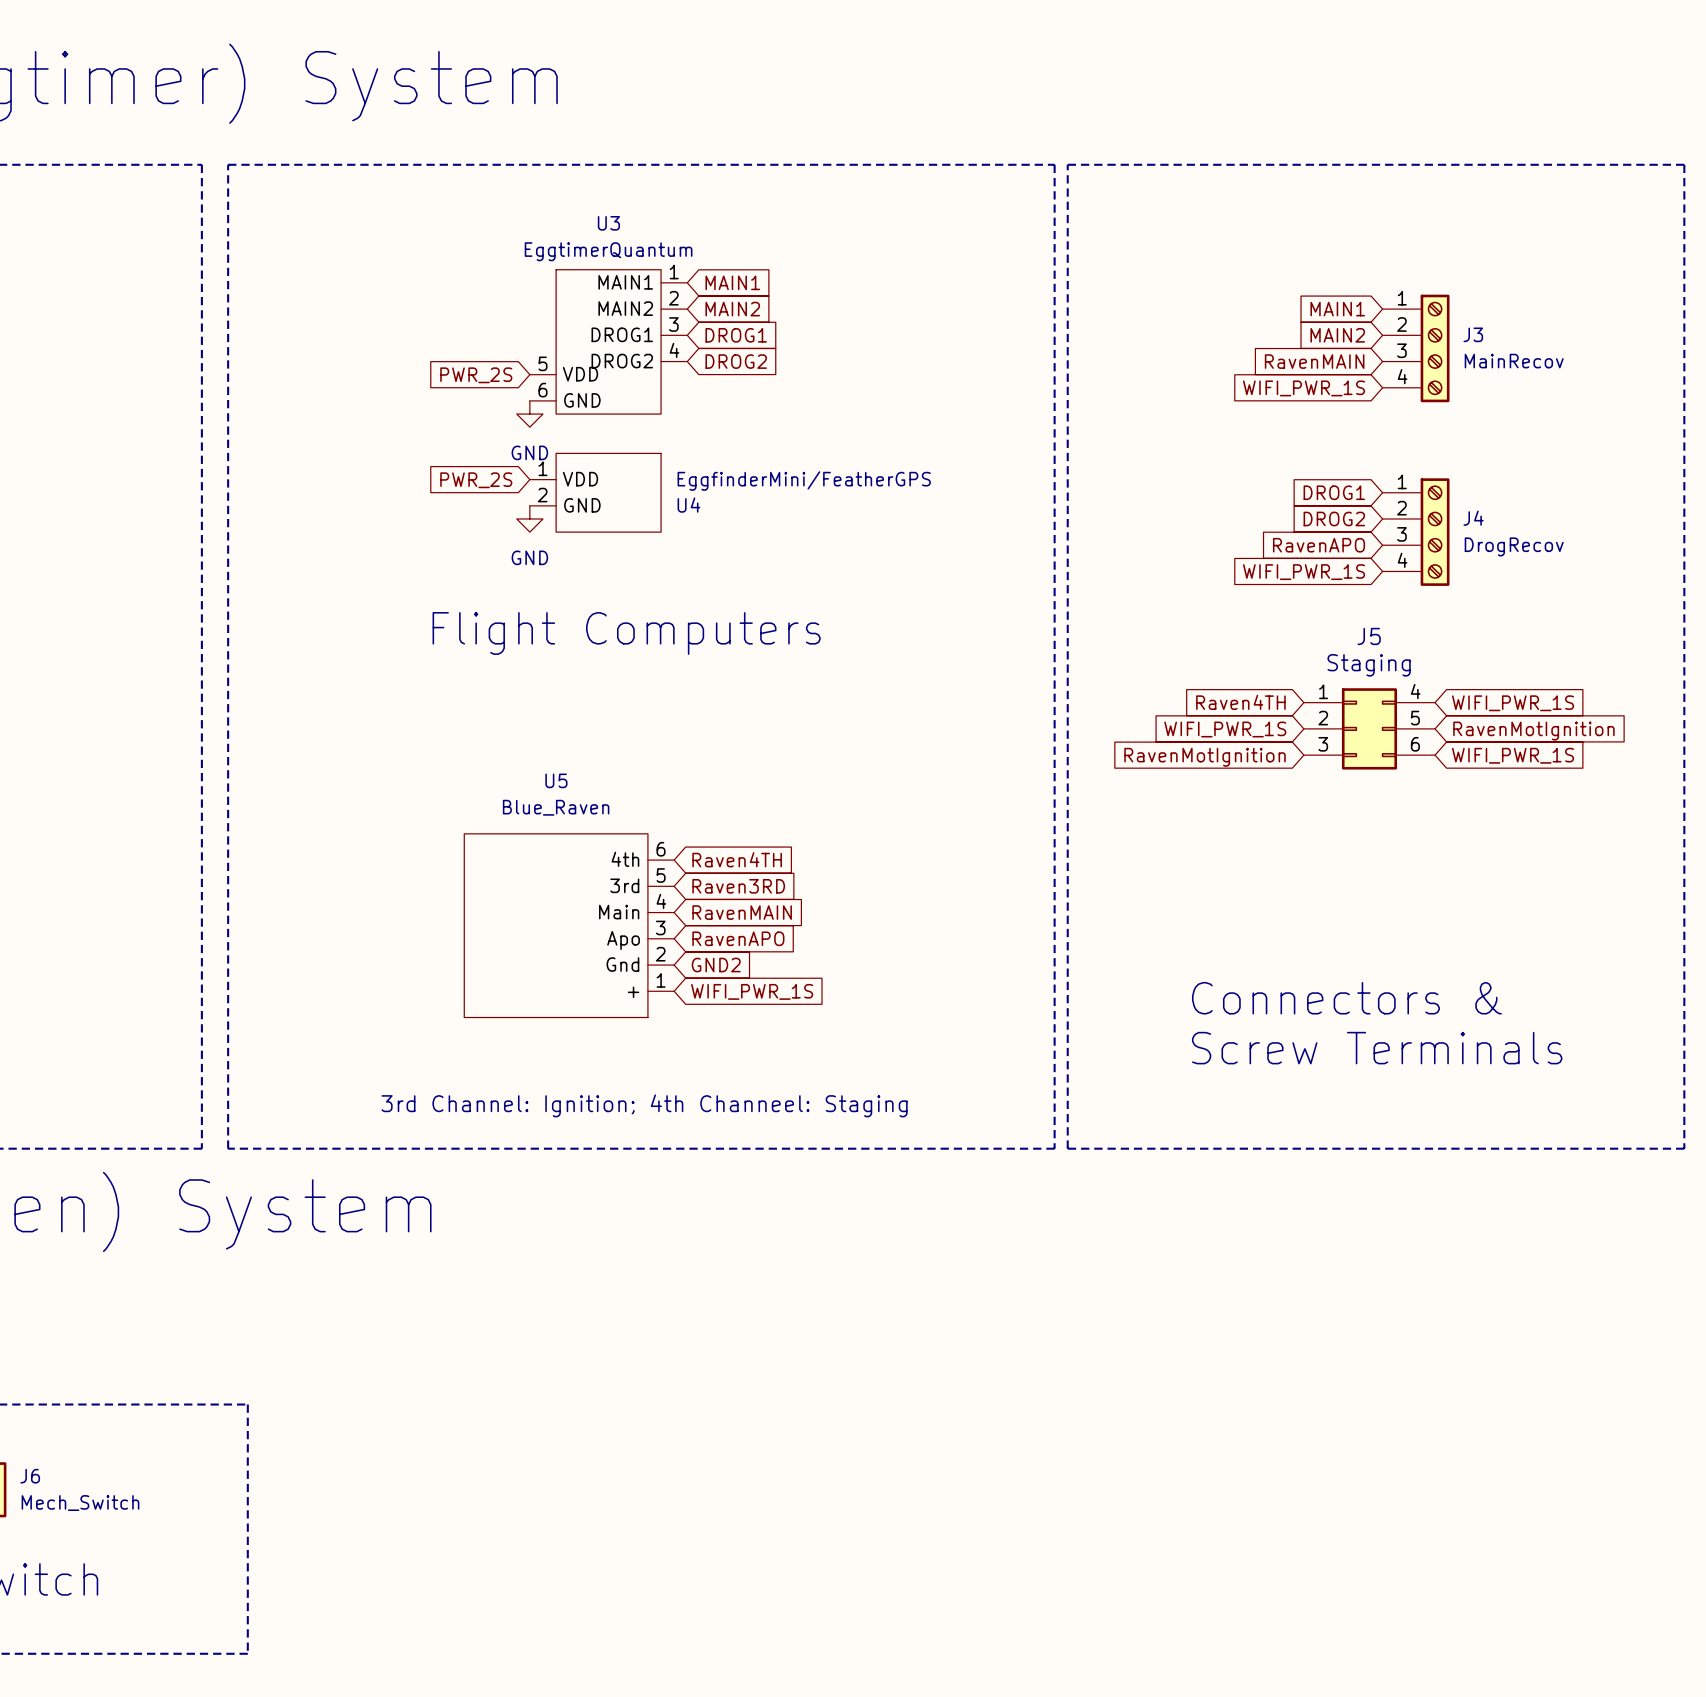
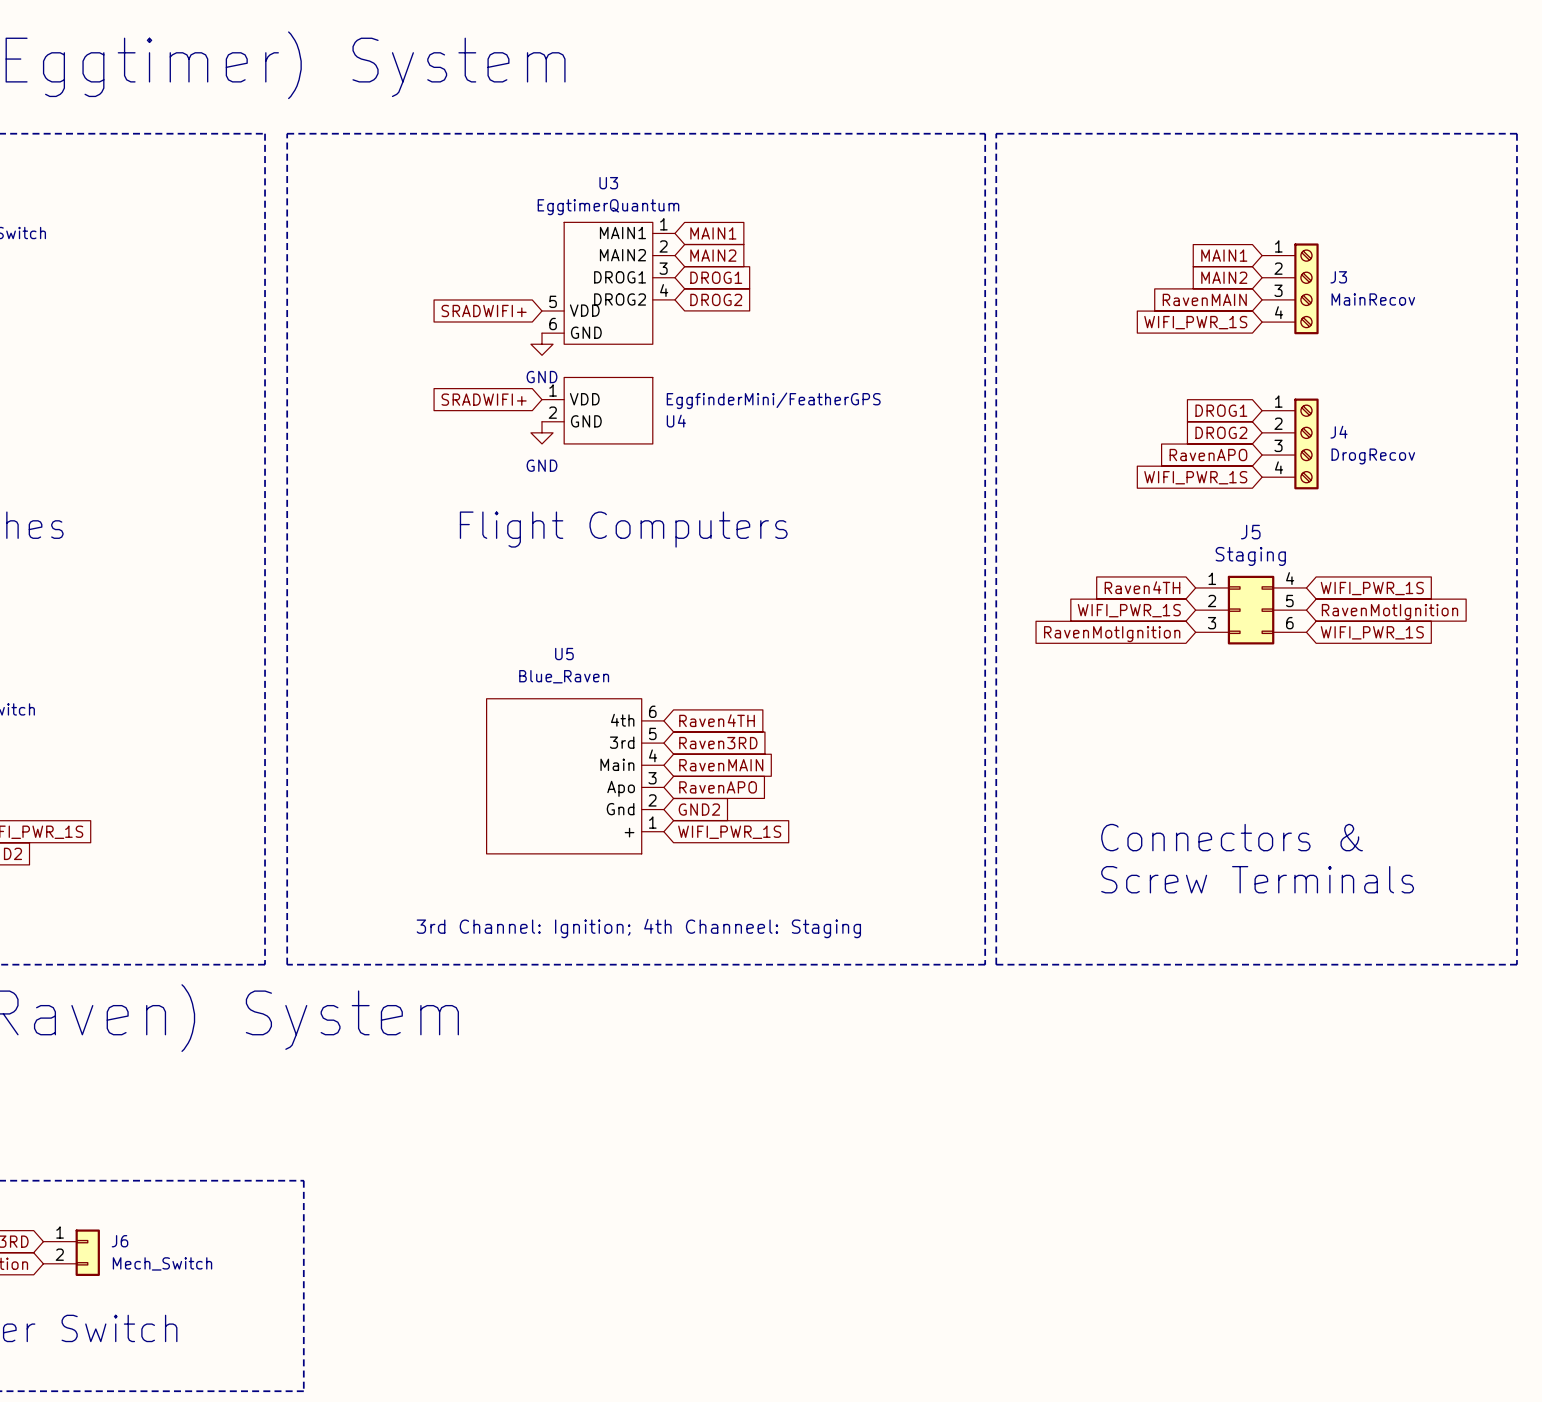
global label: PWR_2S (476, 375) -> SRADWIFI+ (484, 310)
global label: PWR_2S (476, 480) -> SRADWIFI+ (484, 399)

